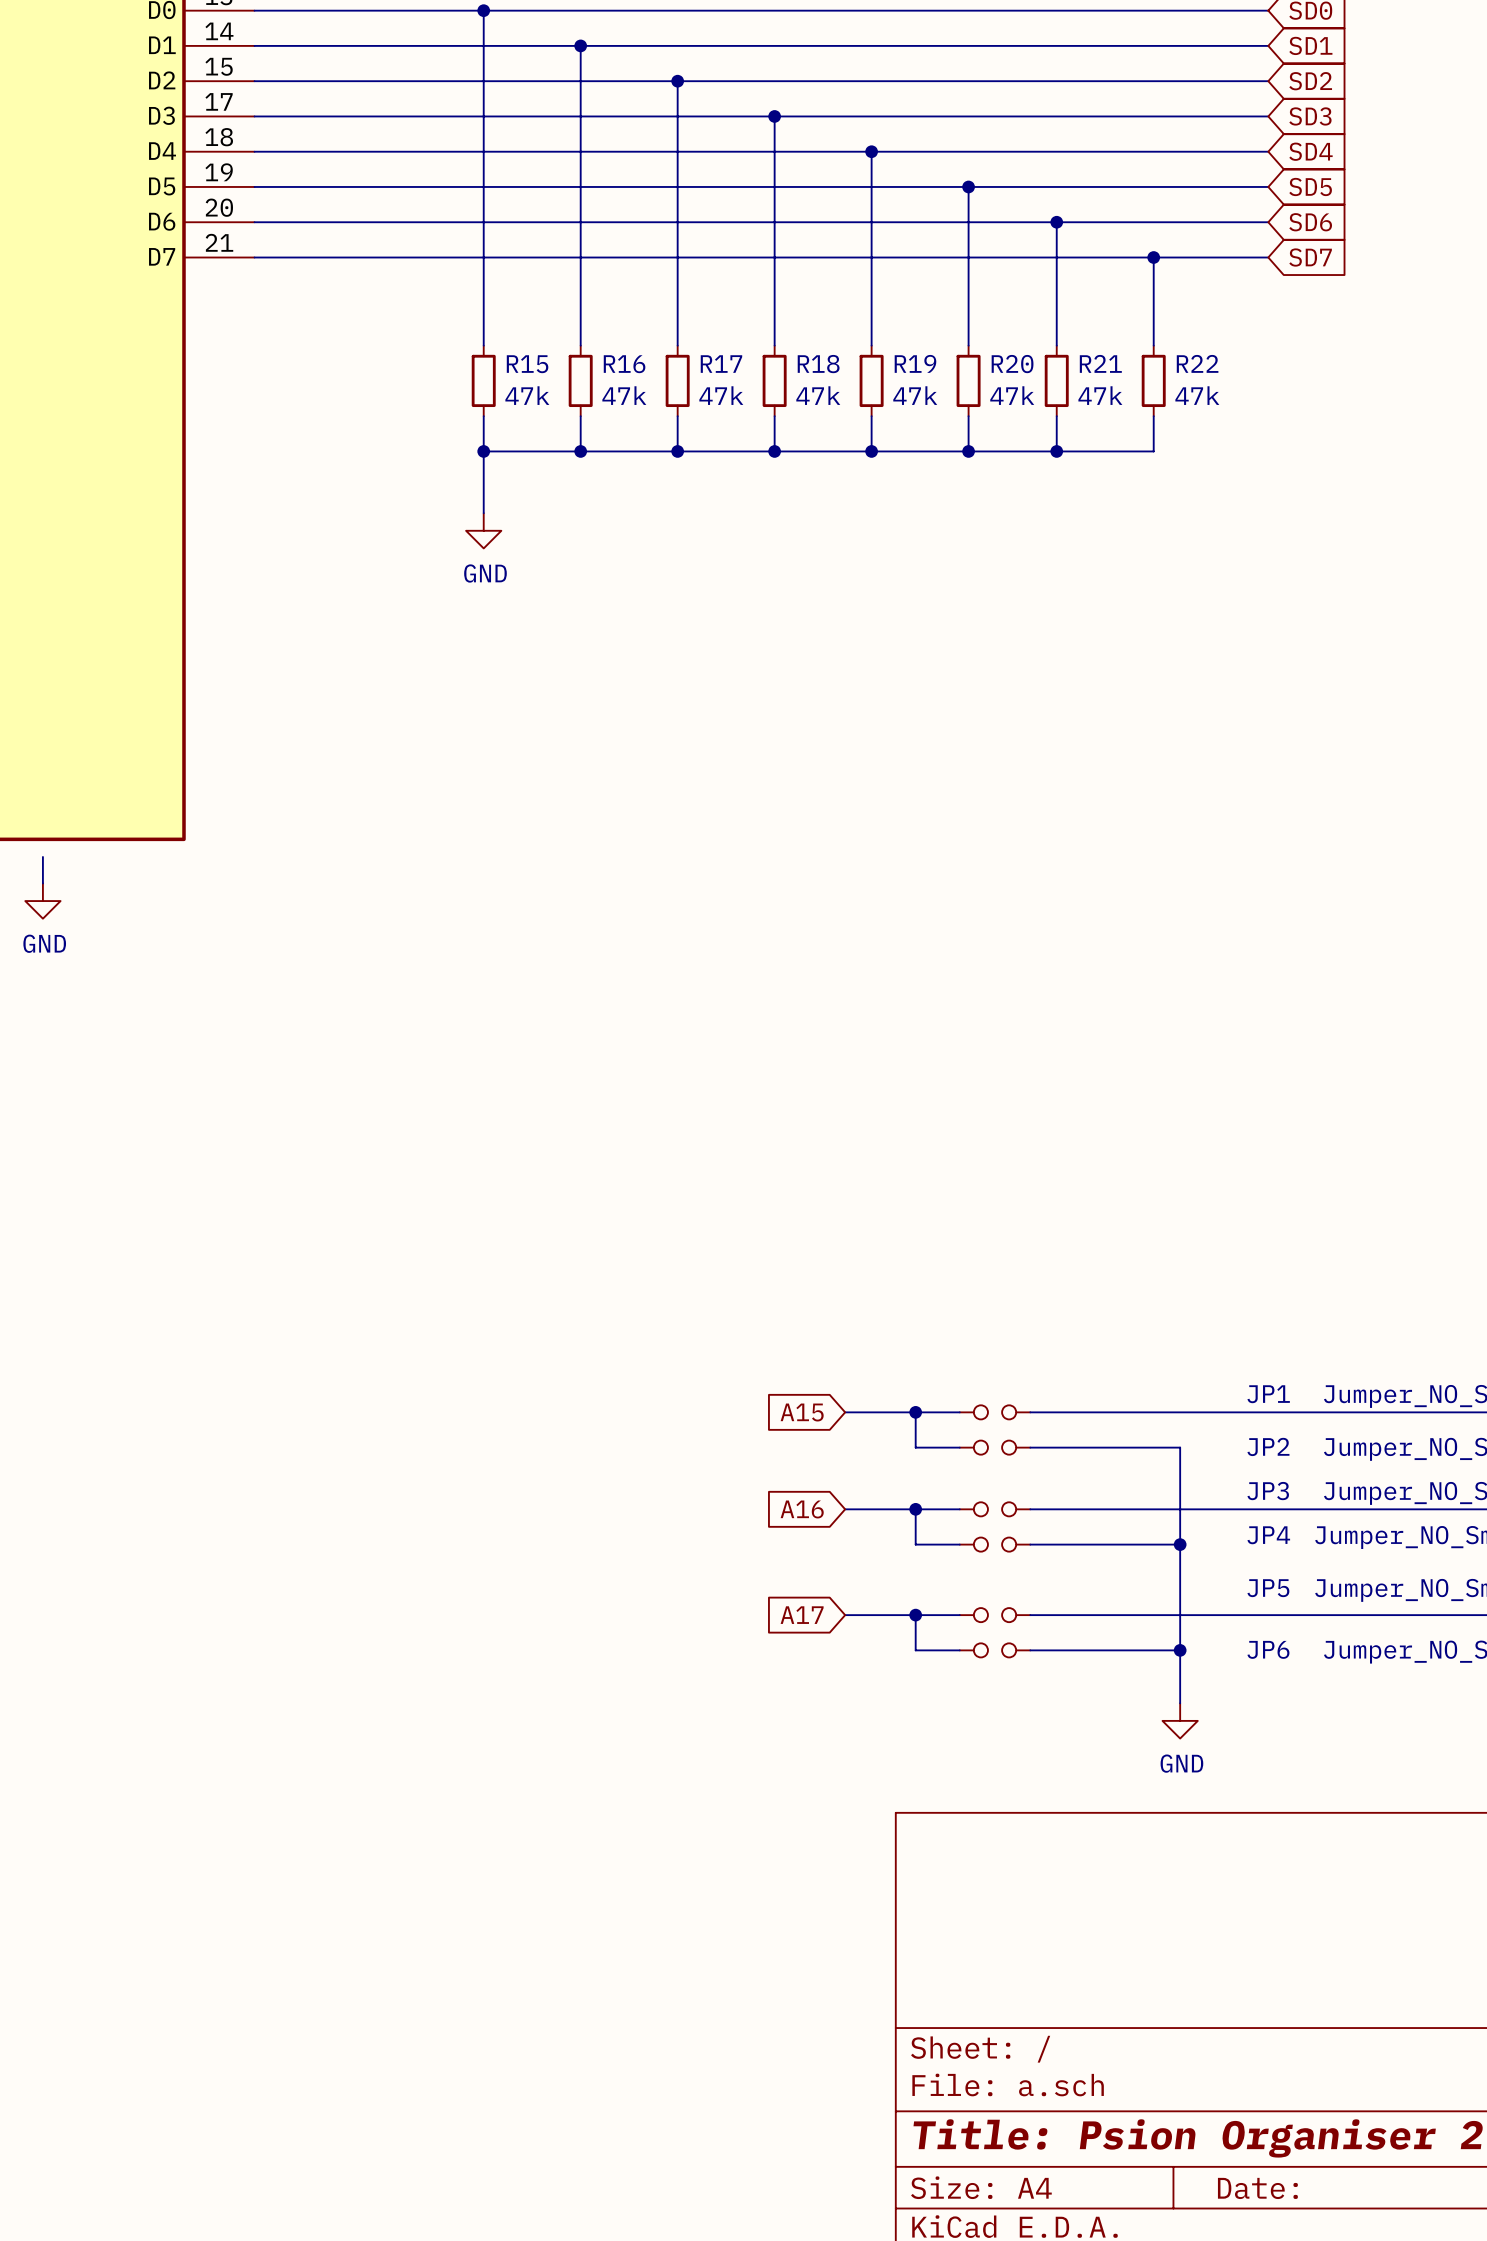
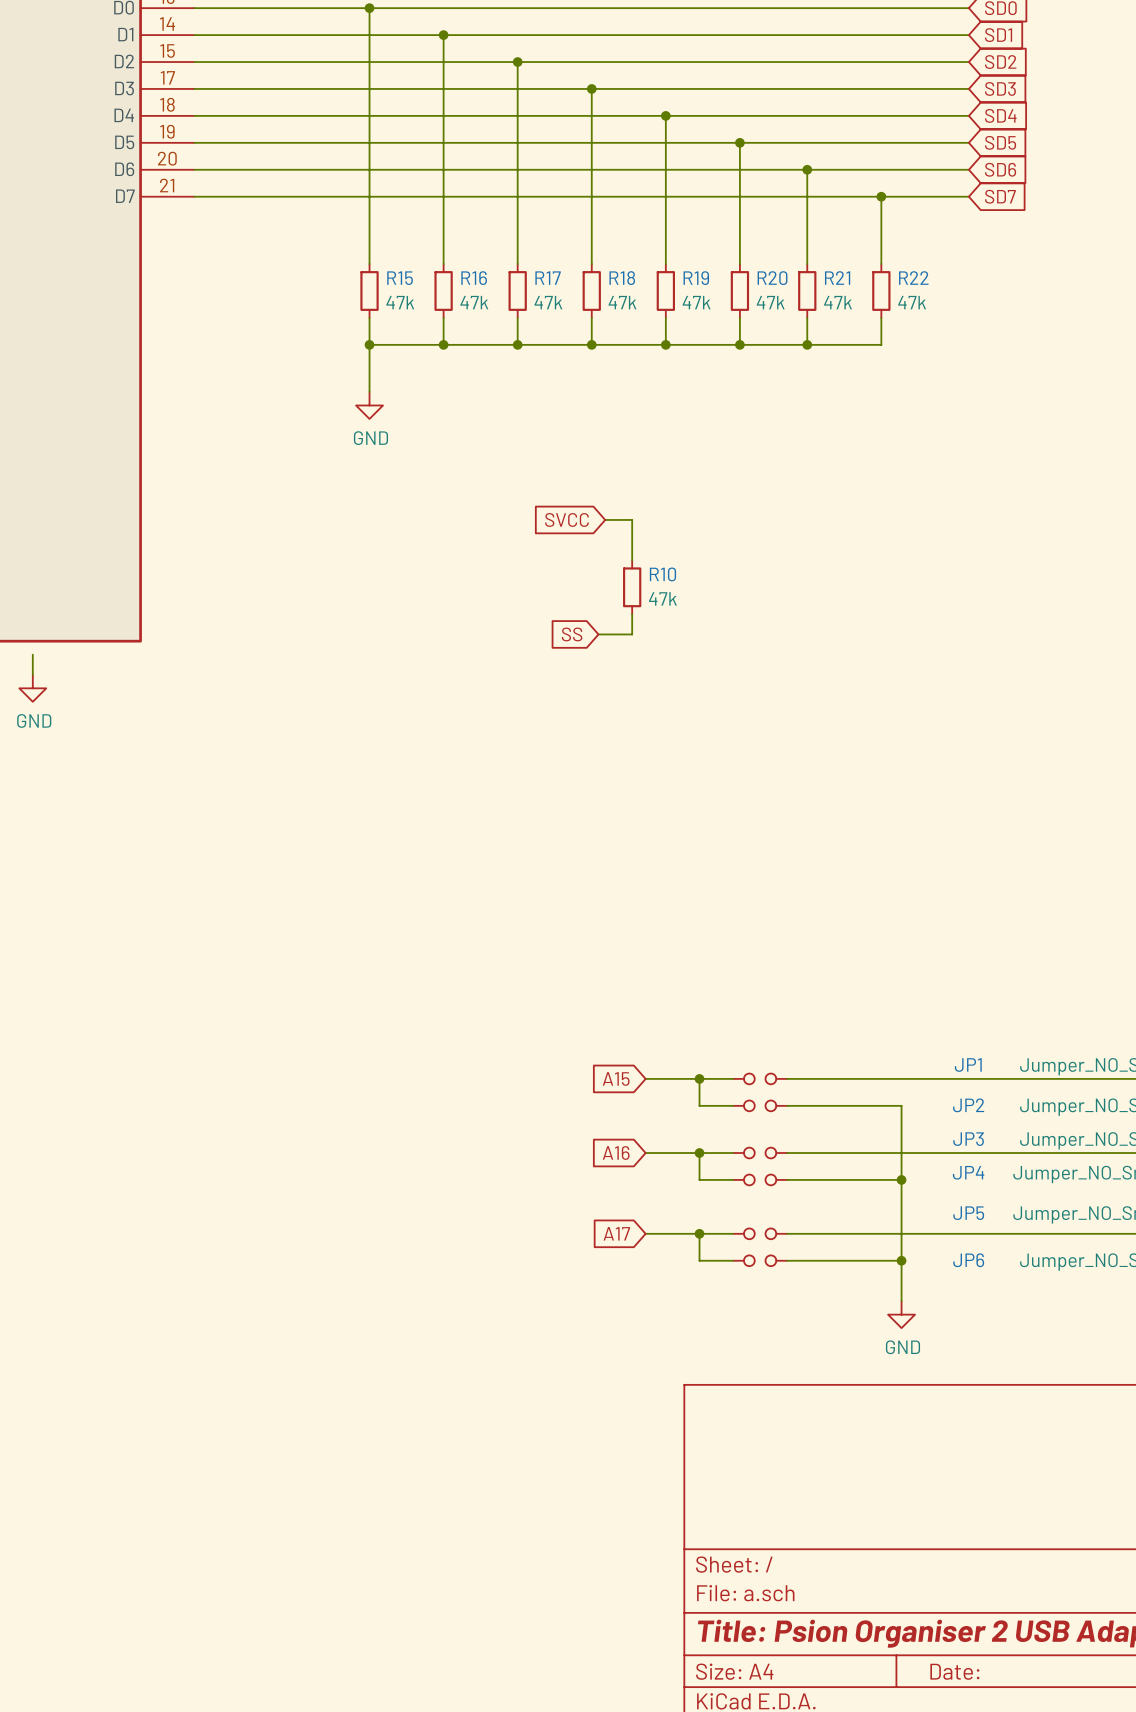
global label: none -> SVCC (566, 519)
wire: none -> (605, 519) (632, 519) (632, 560)
R10: none -> 47k (632, 587)
wire: none -> (632, 614) (632, 634) (598, 634)
global label: none -> SS (572, 634)

